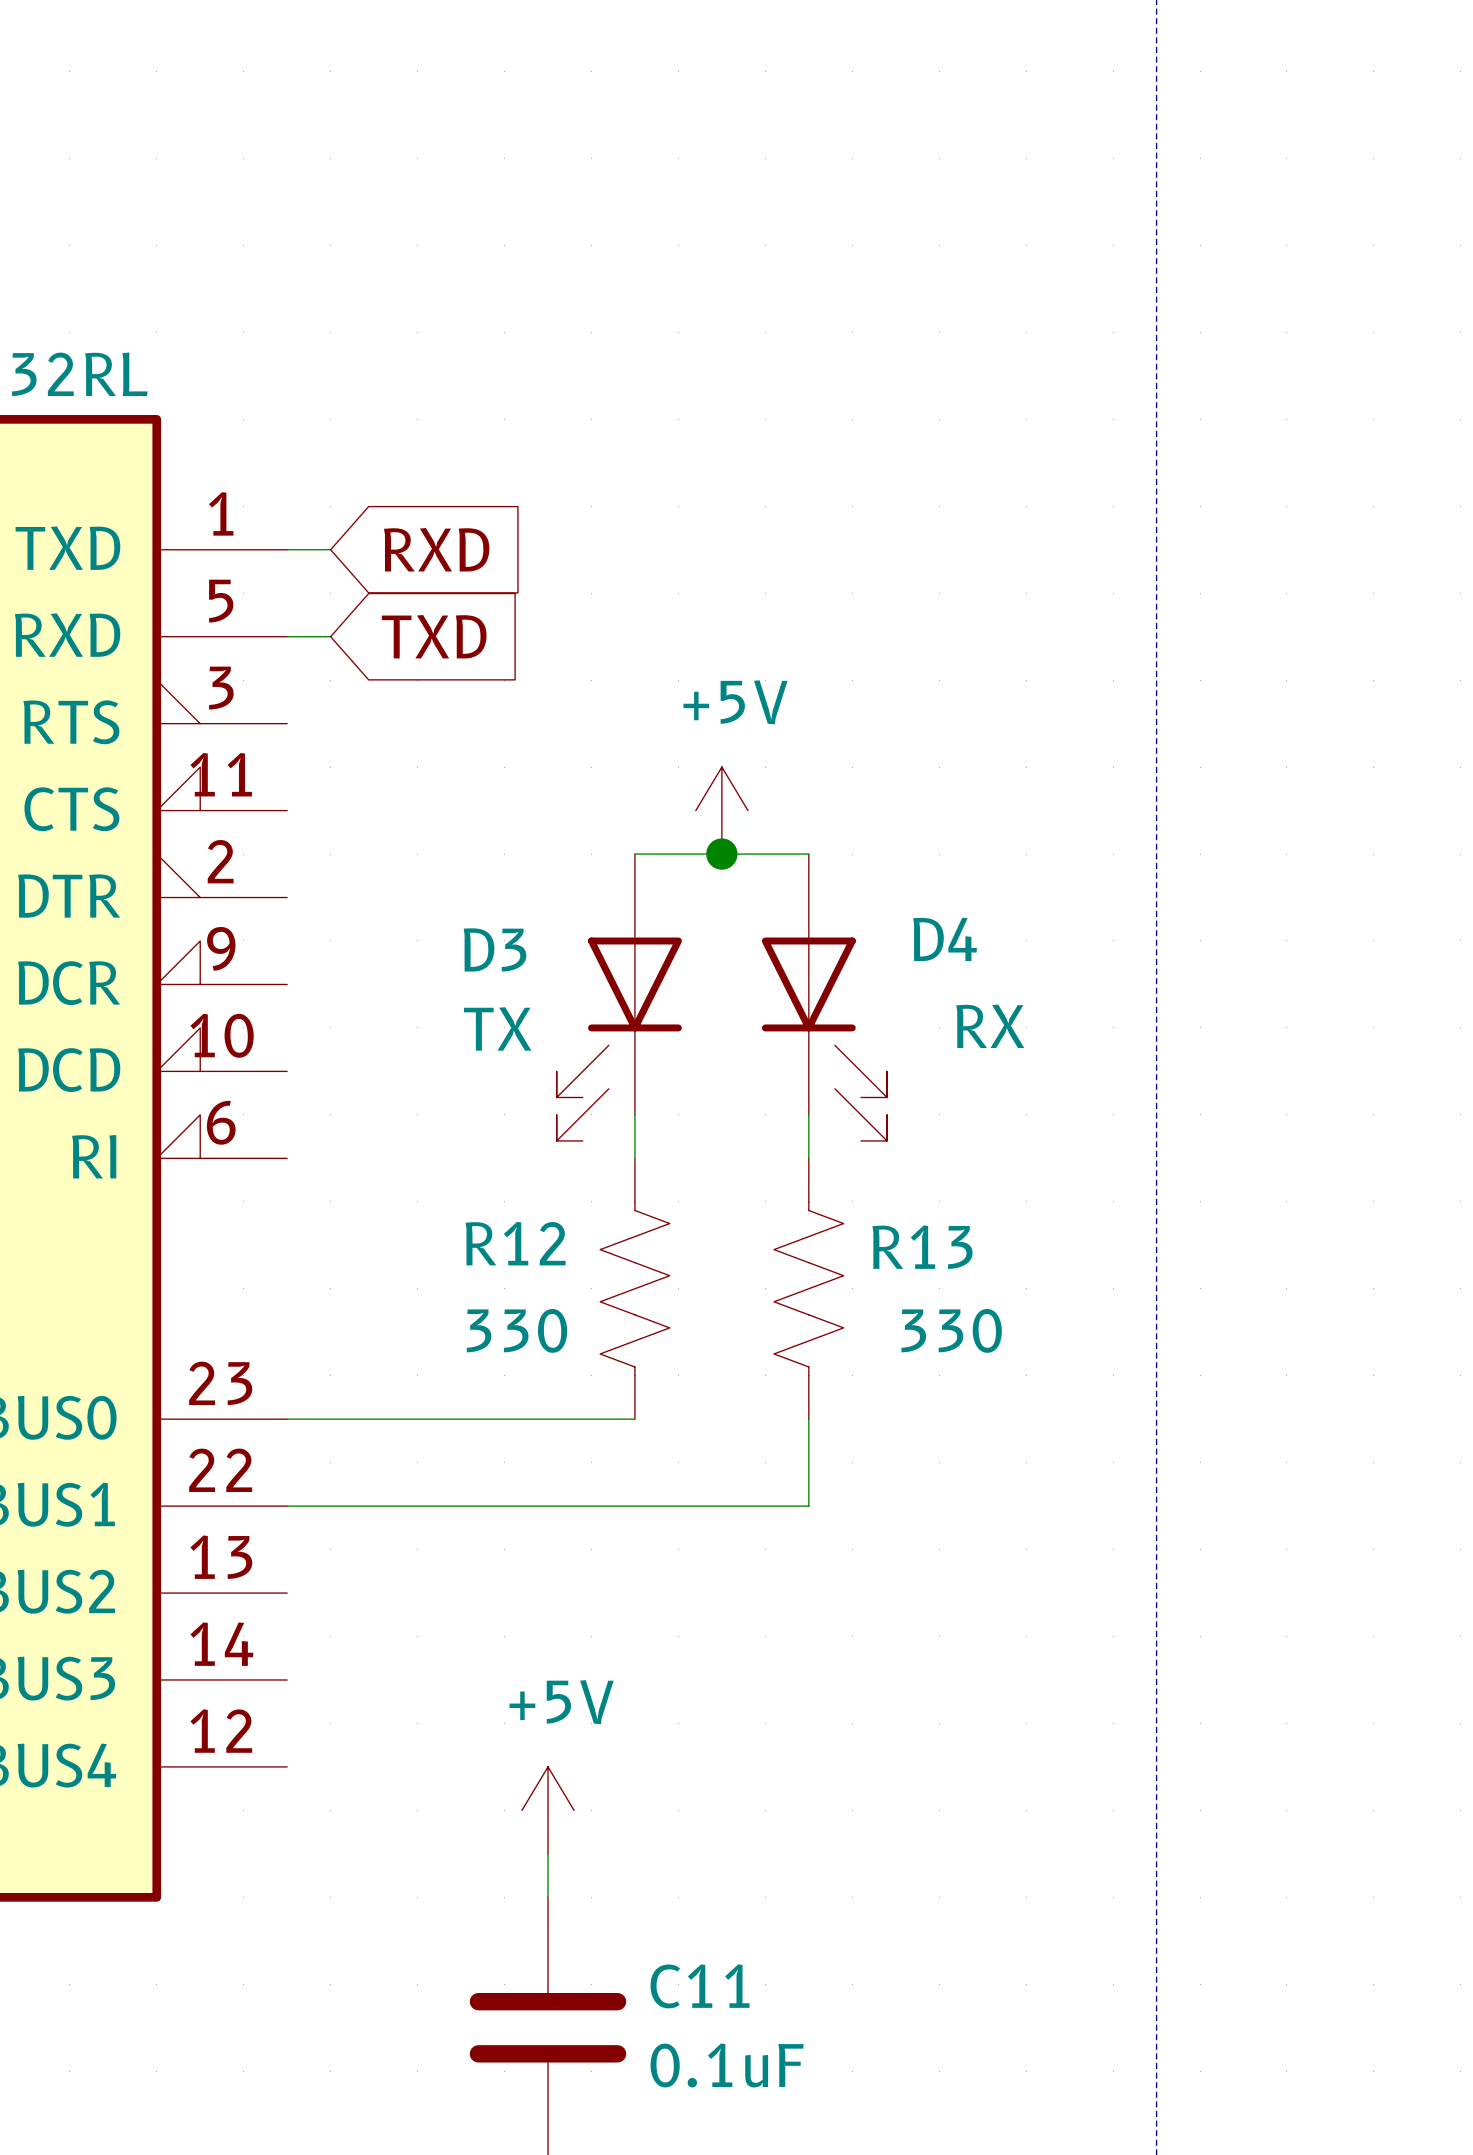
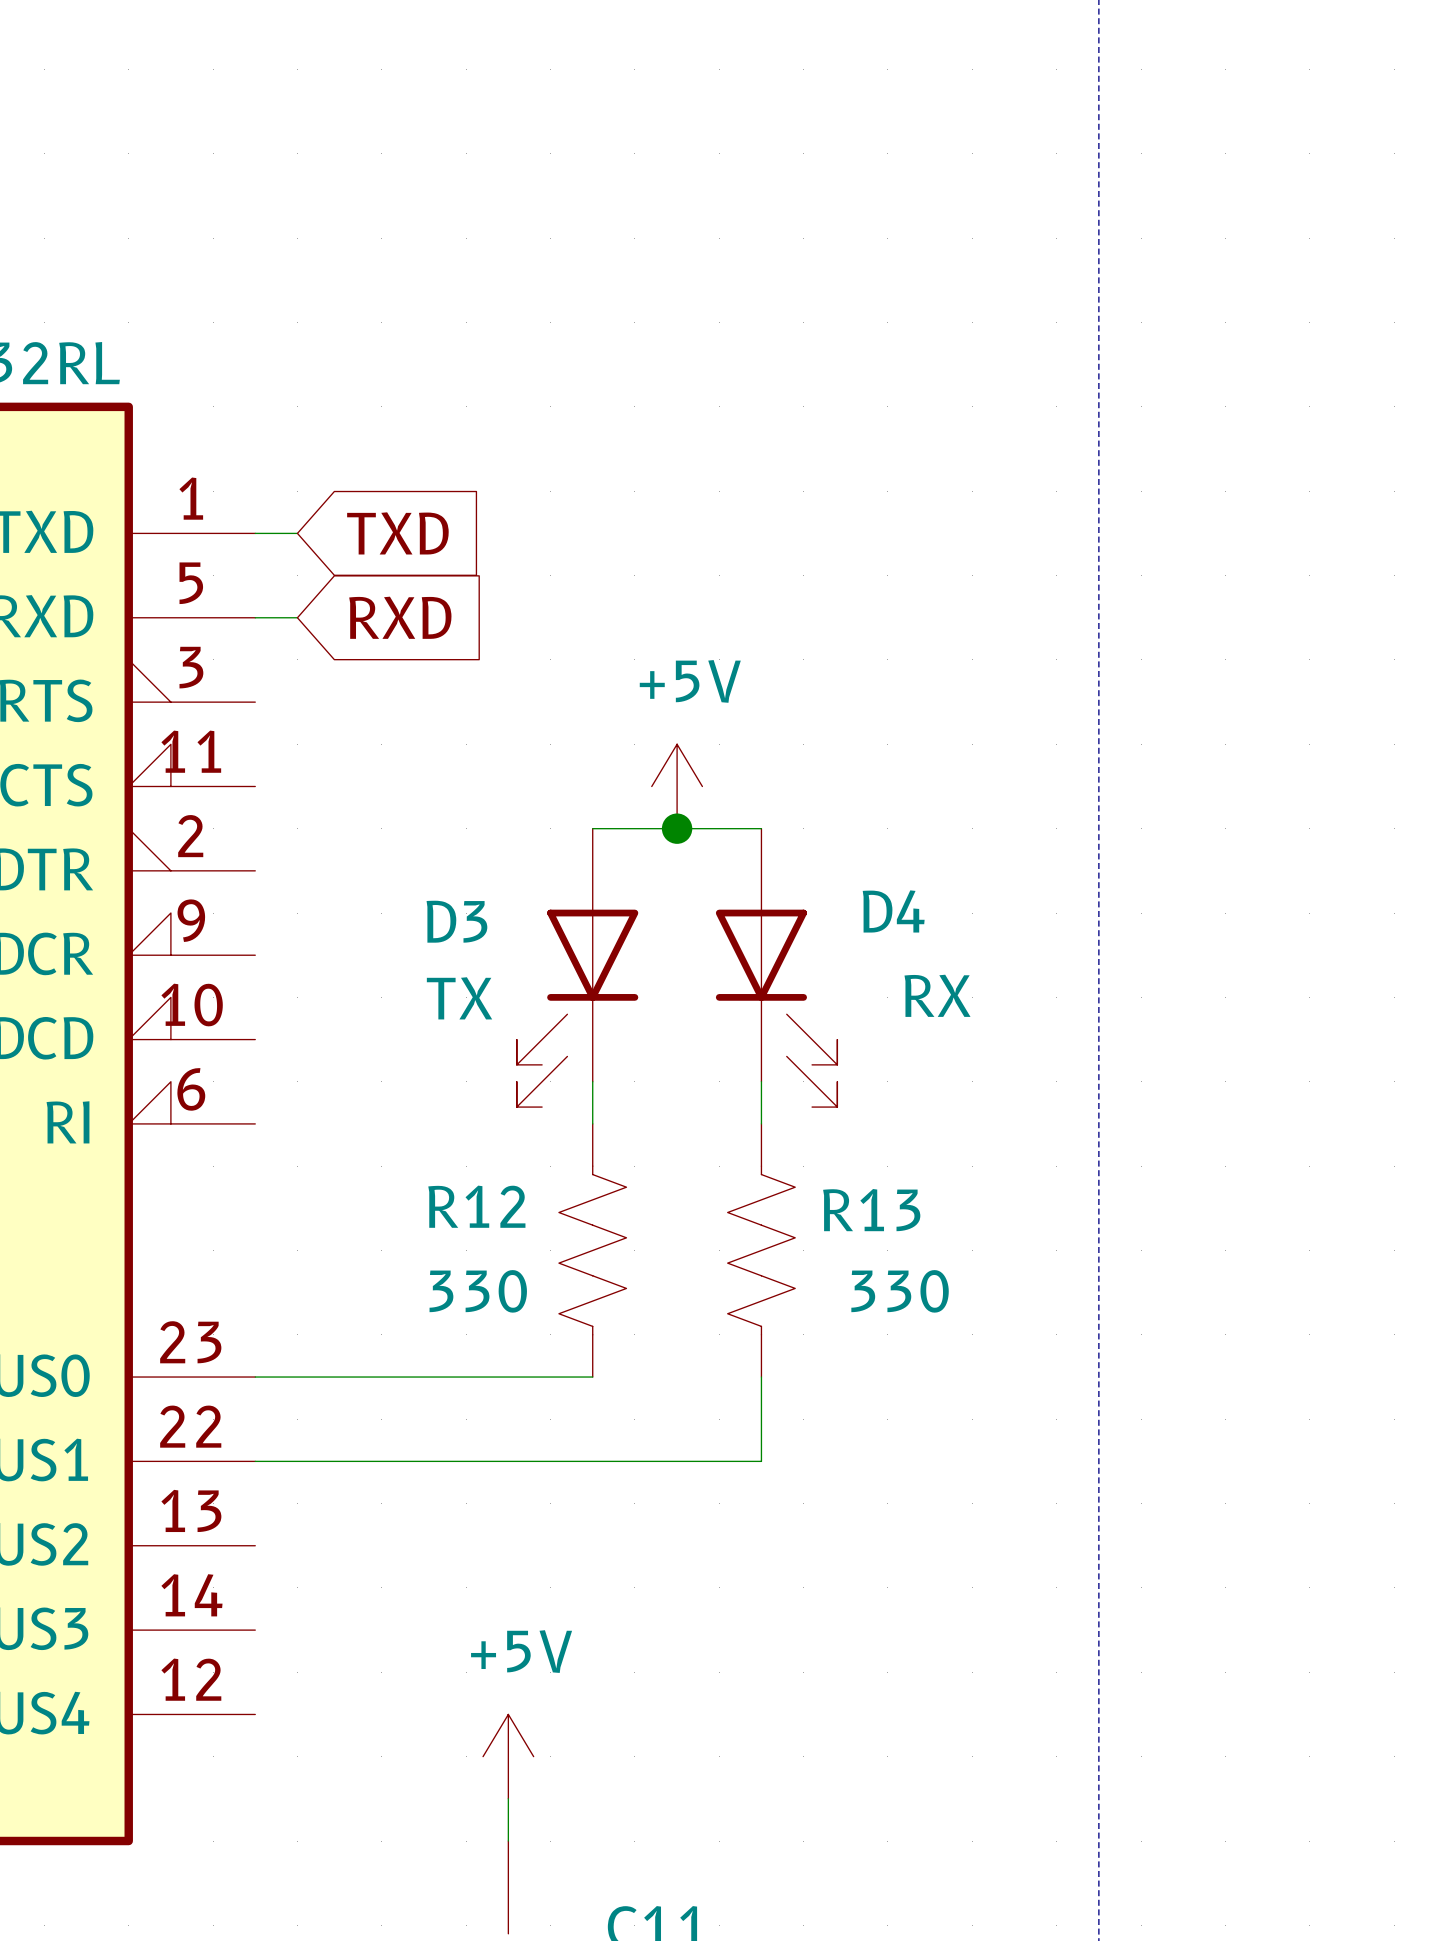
global label: RXD (436, 549) -> TXD (397, 533)
global label: TXD (434, 636) -> RXD (400, 617)

